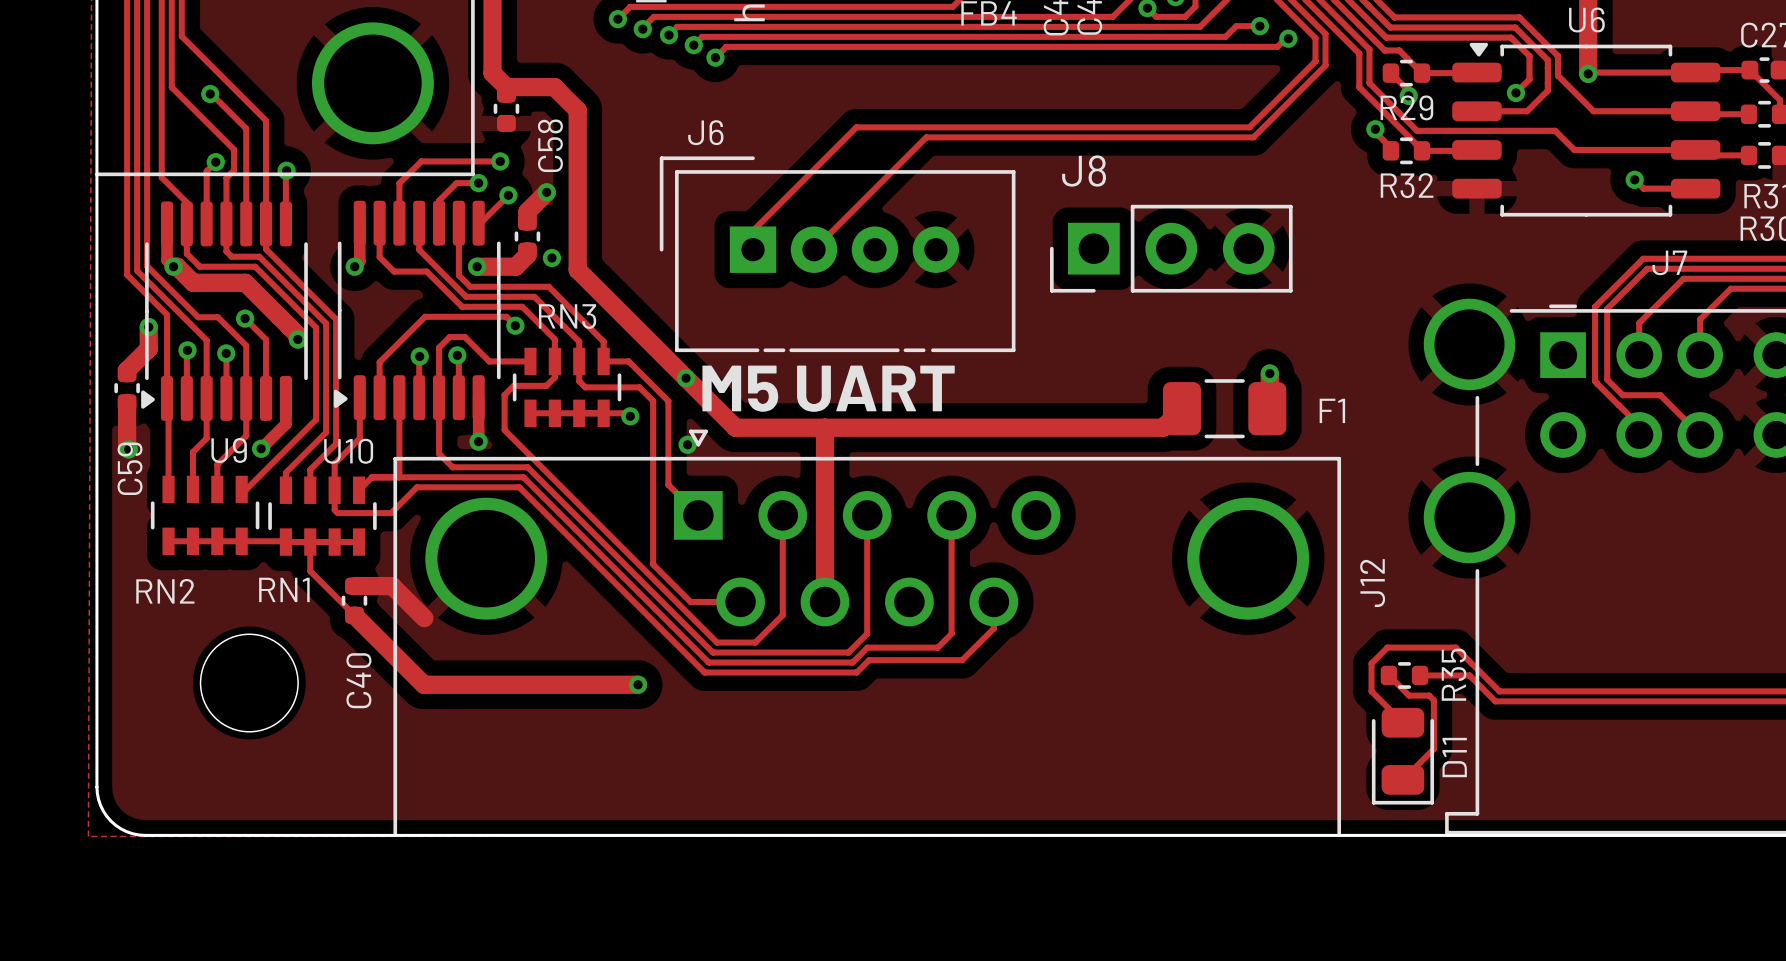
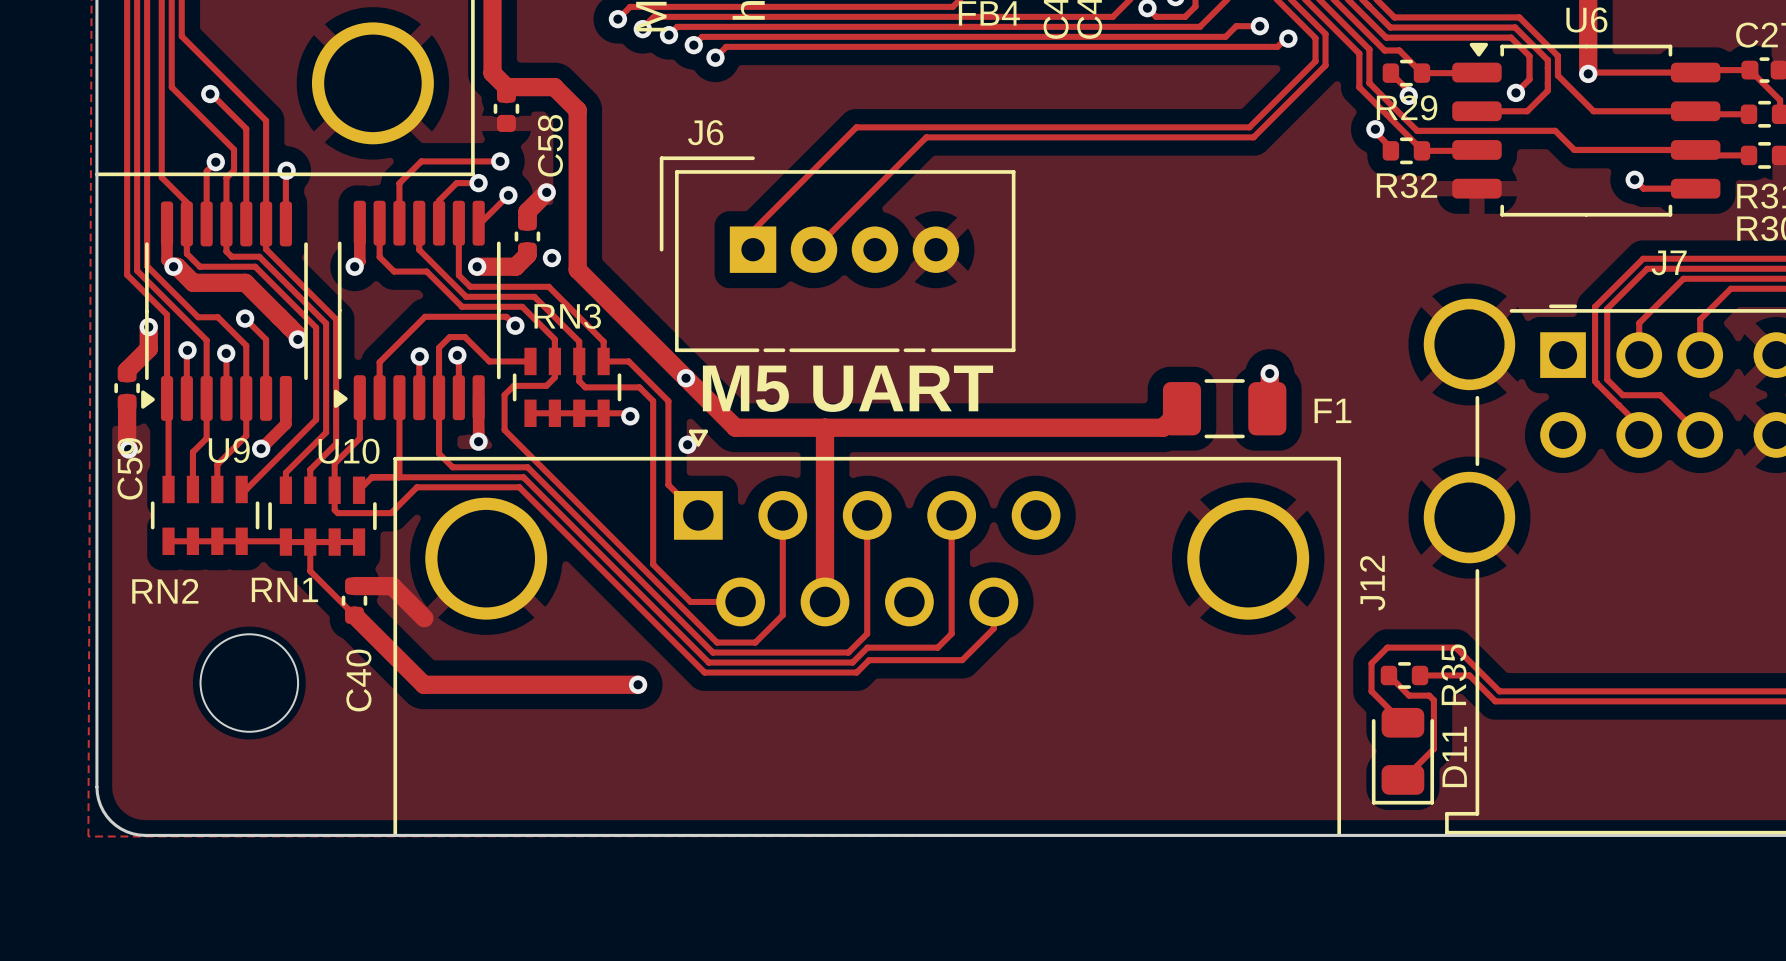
J8: (1171, 248) -> none

